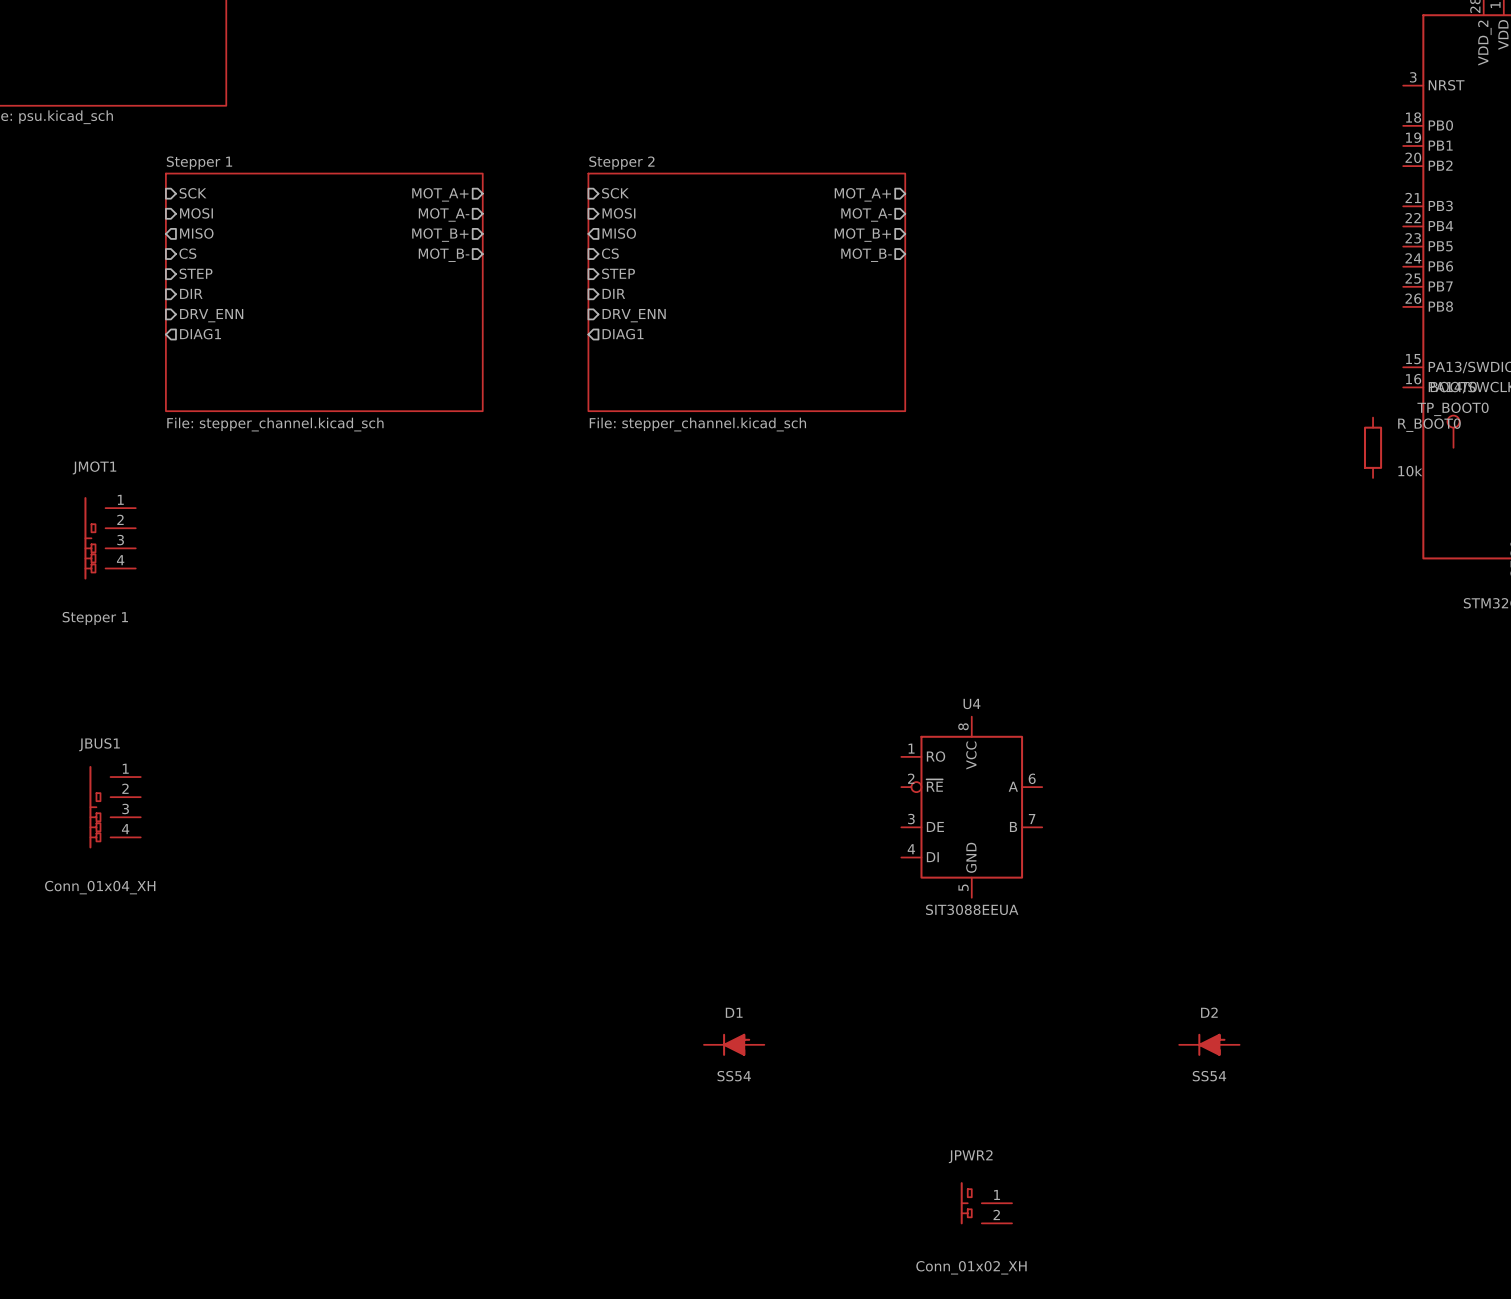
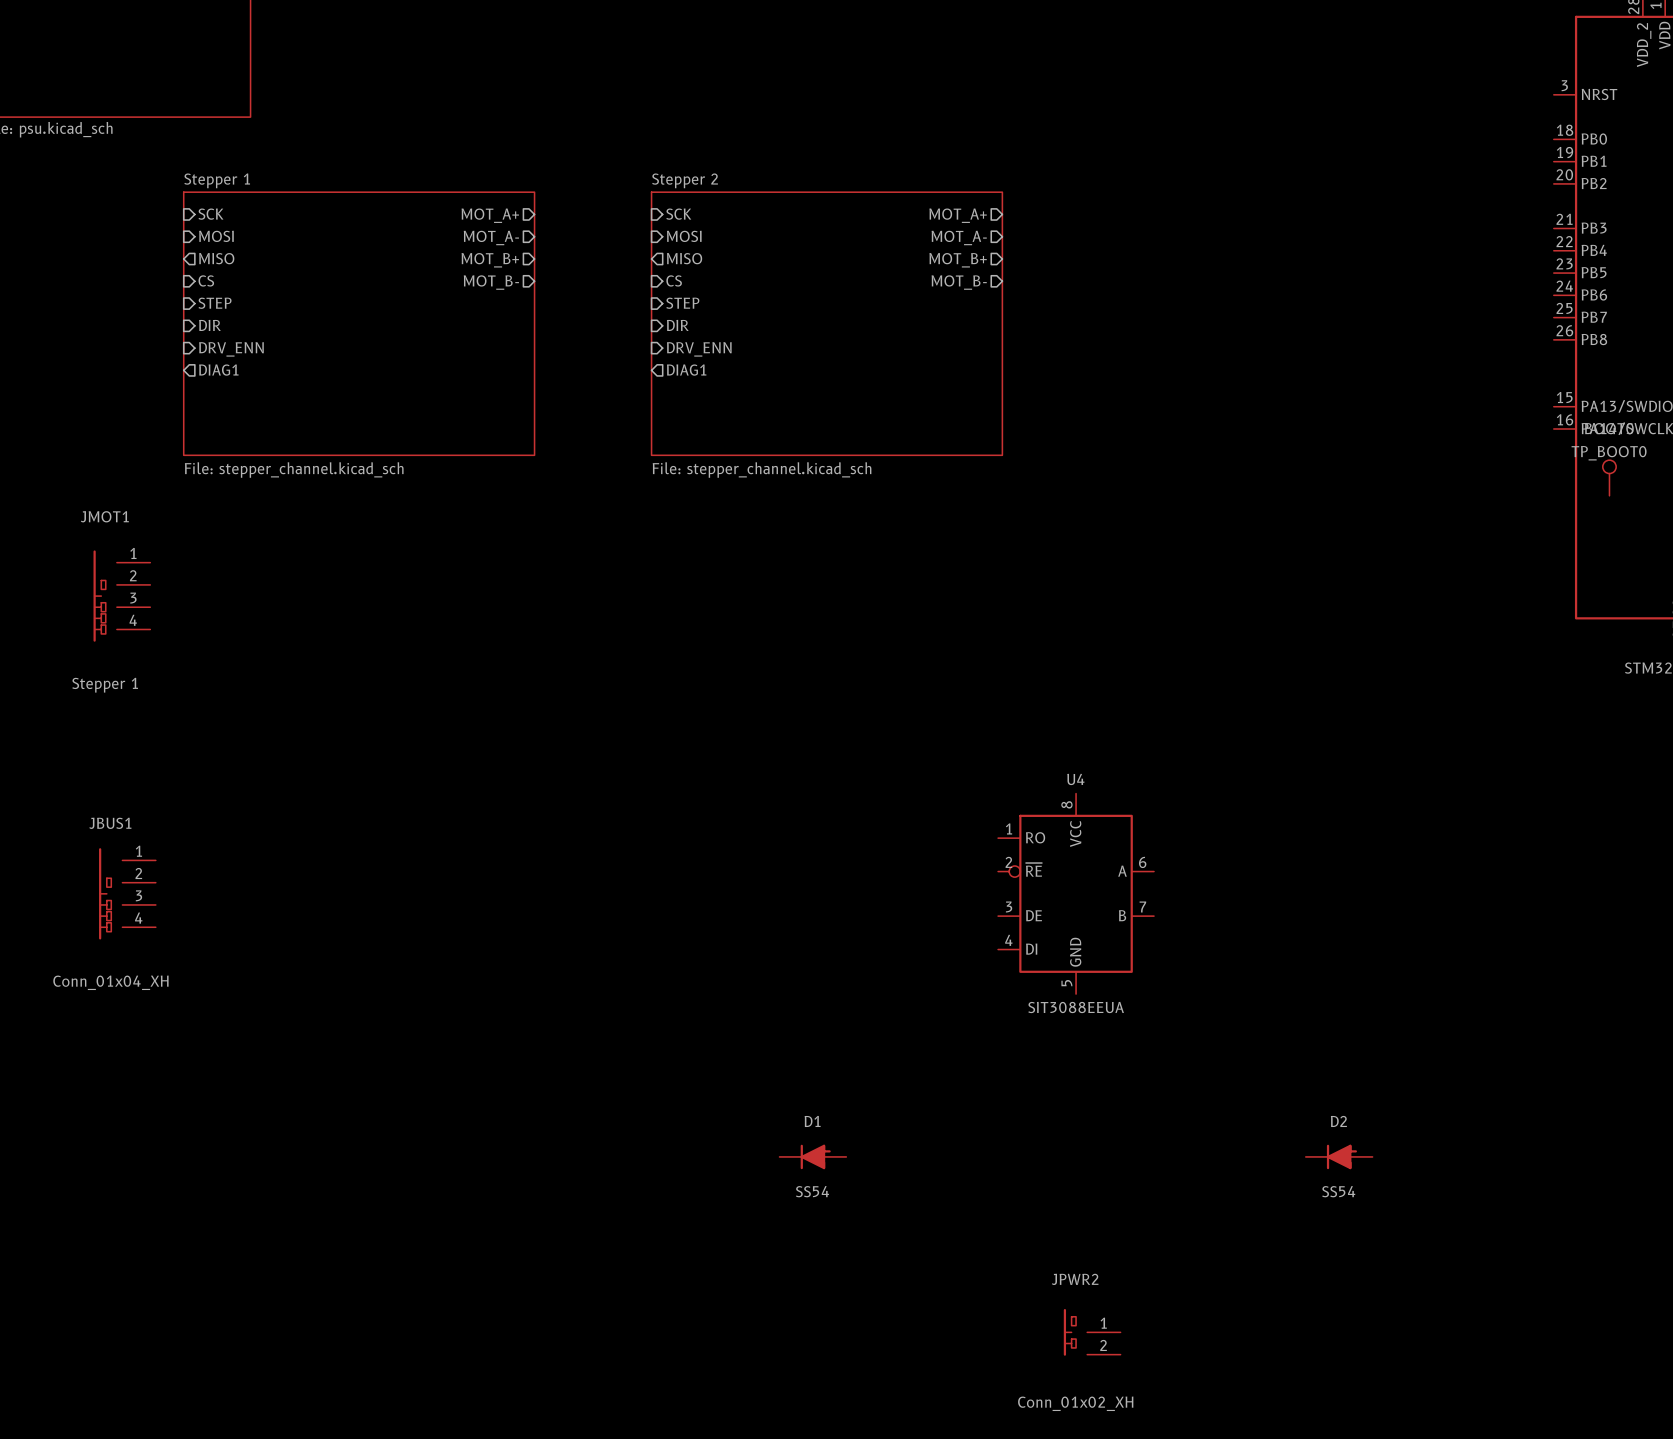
R_BOOT0: 10k (1373, 447) -> none

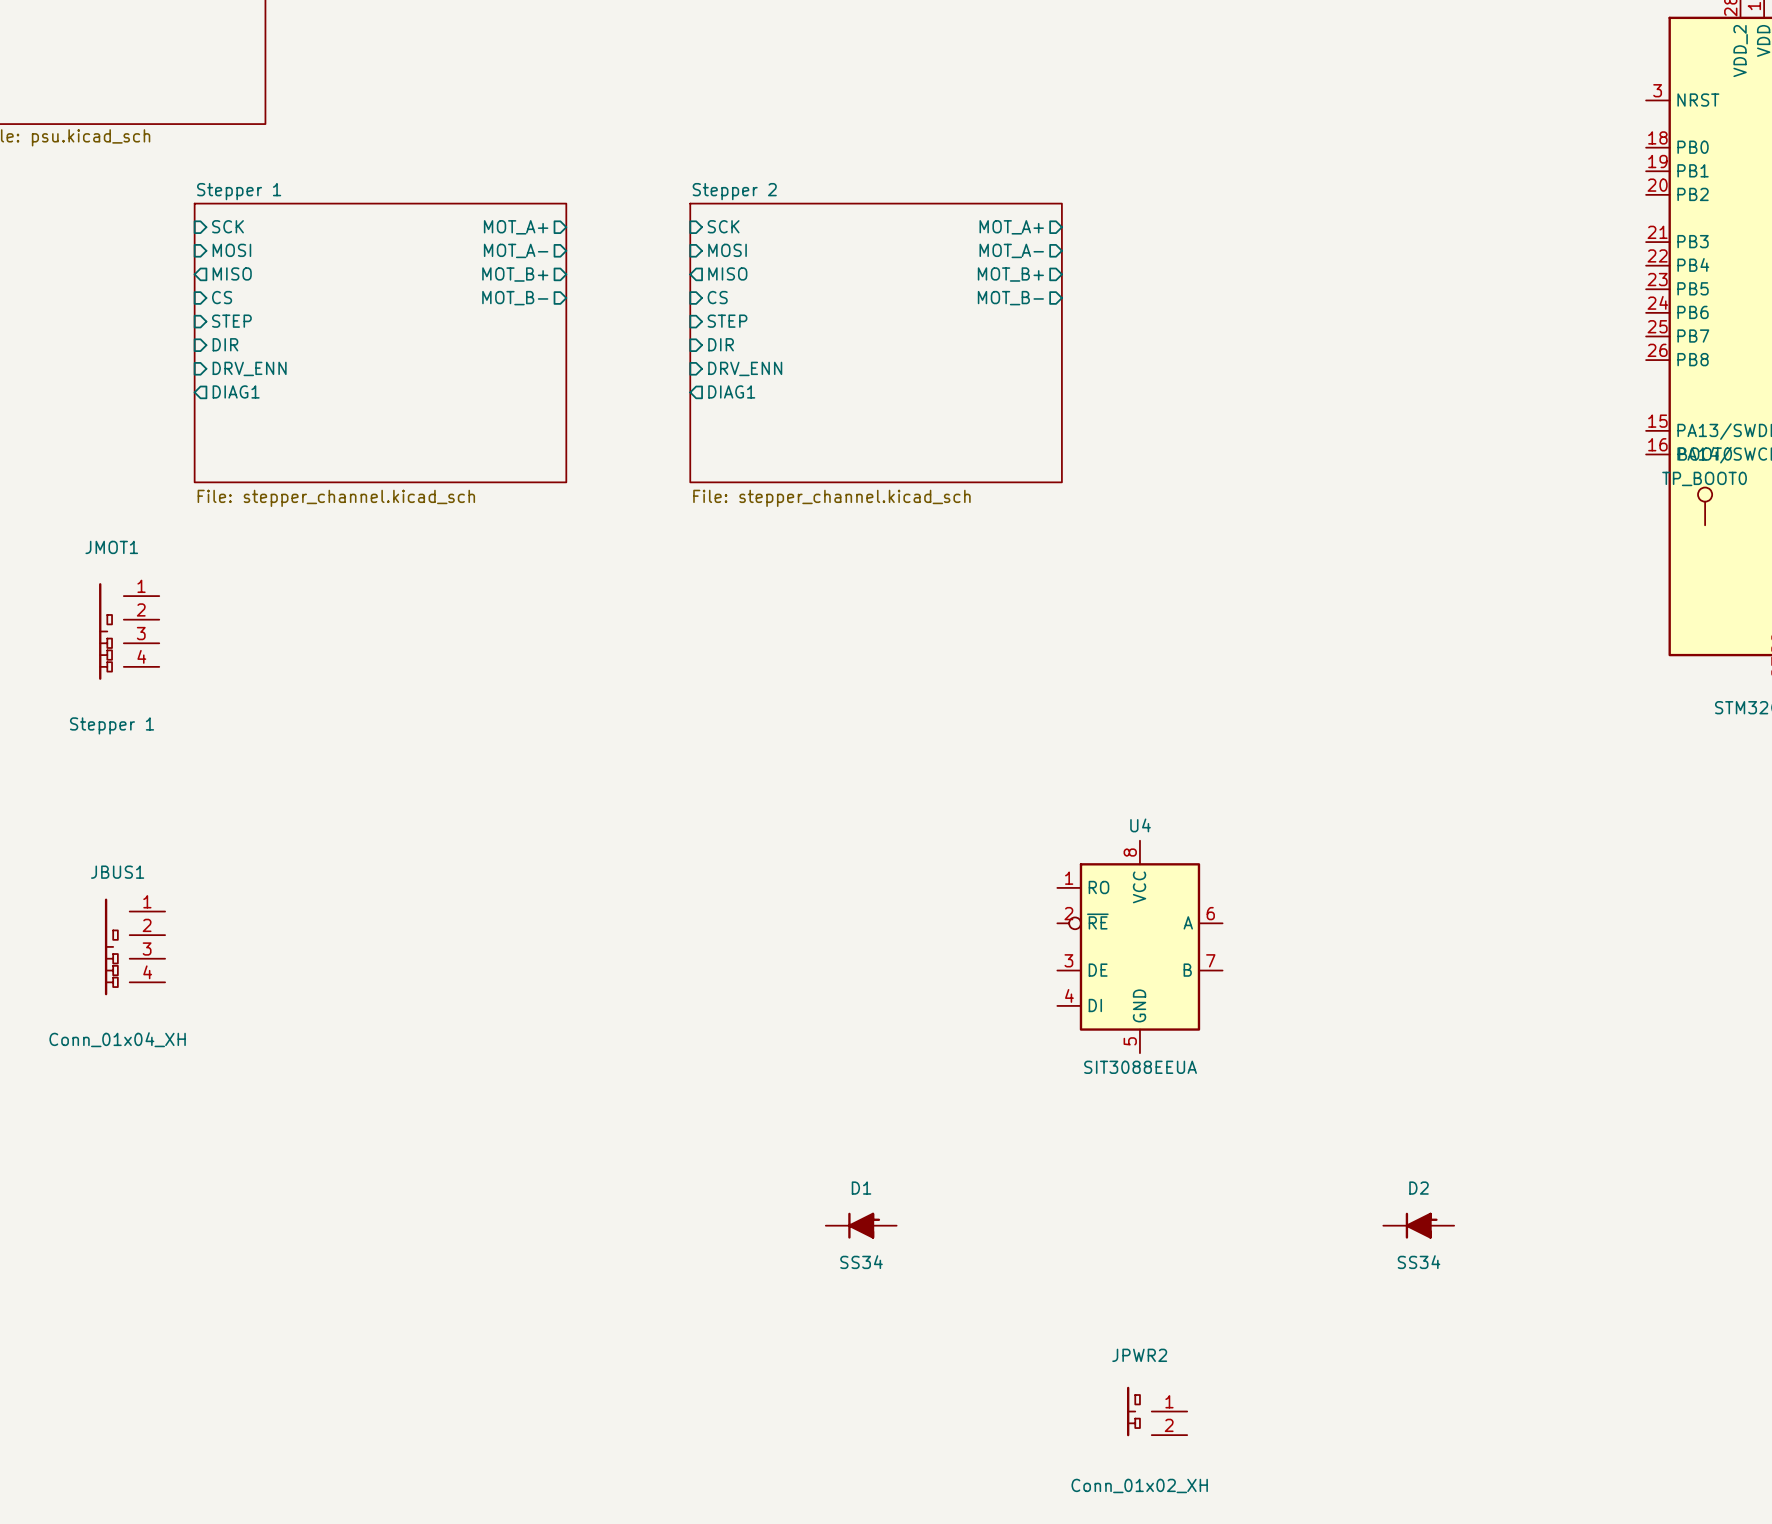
D1 value: SS54 (812, 1191) -> SS34 (861, 1262)
D2 value: SS54 (1338, 1191) -> SS34 (1419, 1262)

